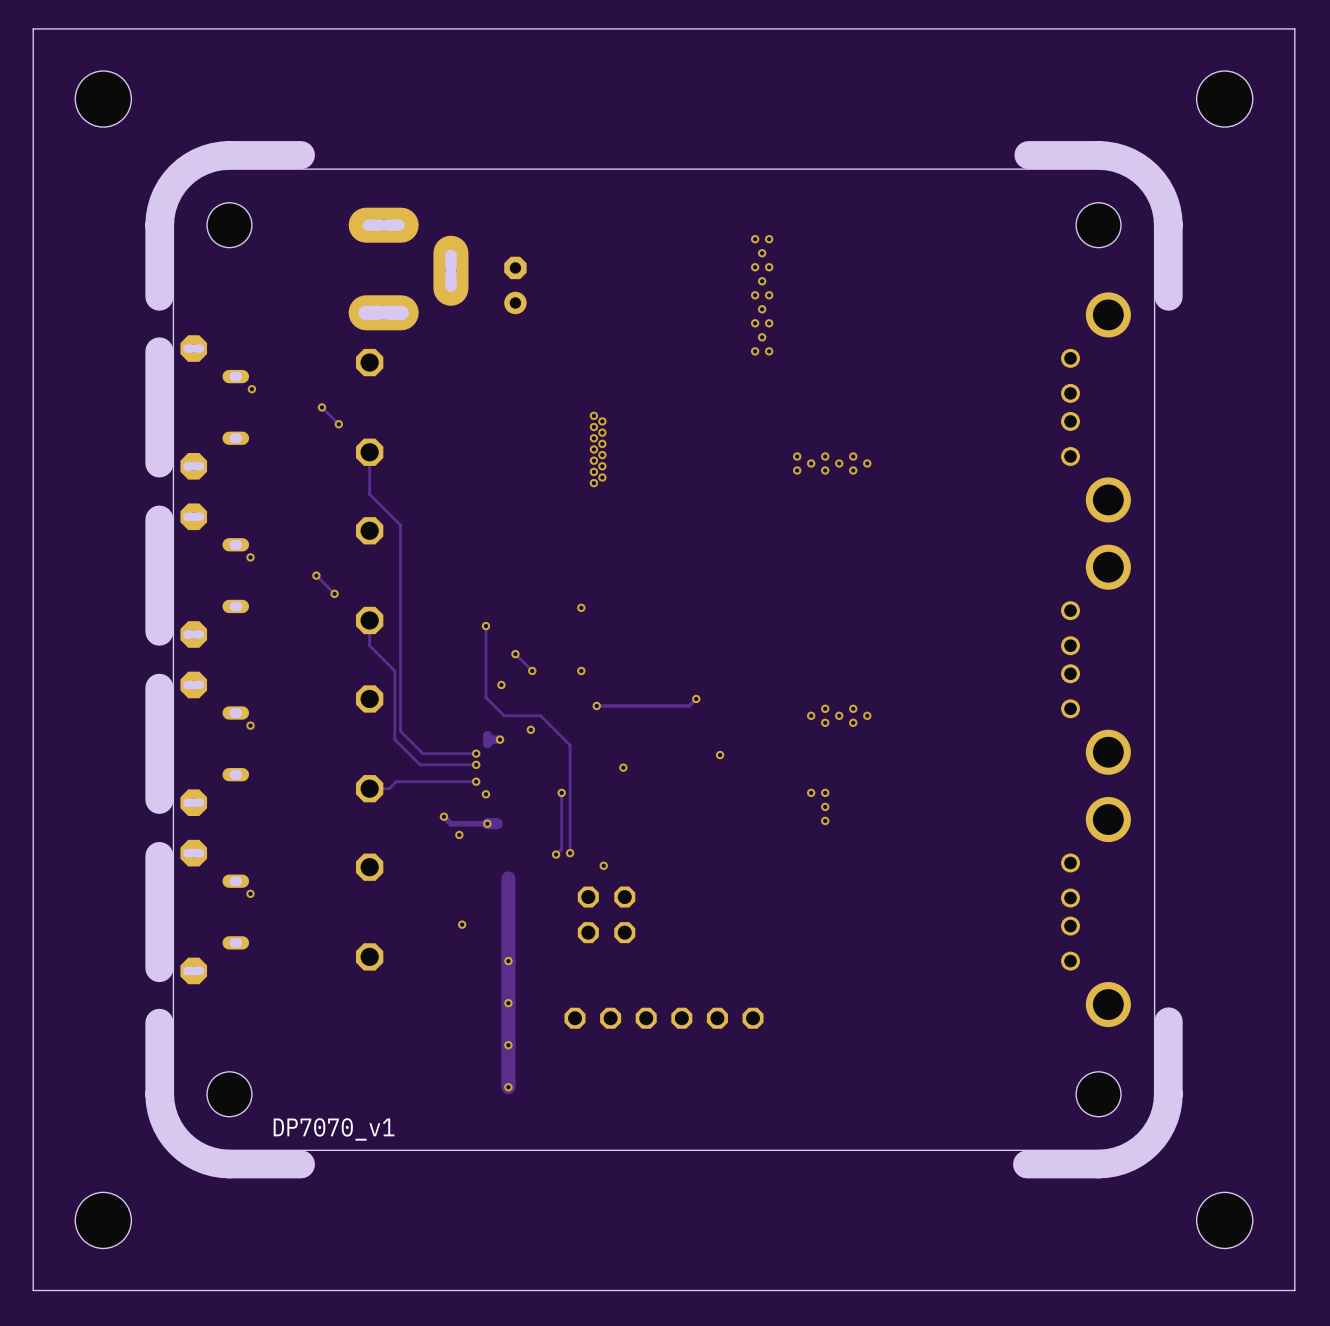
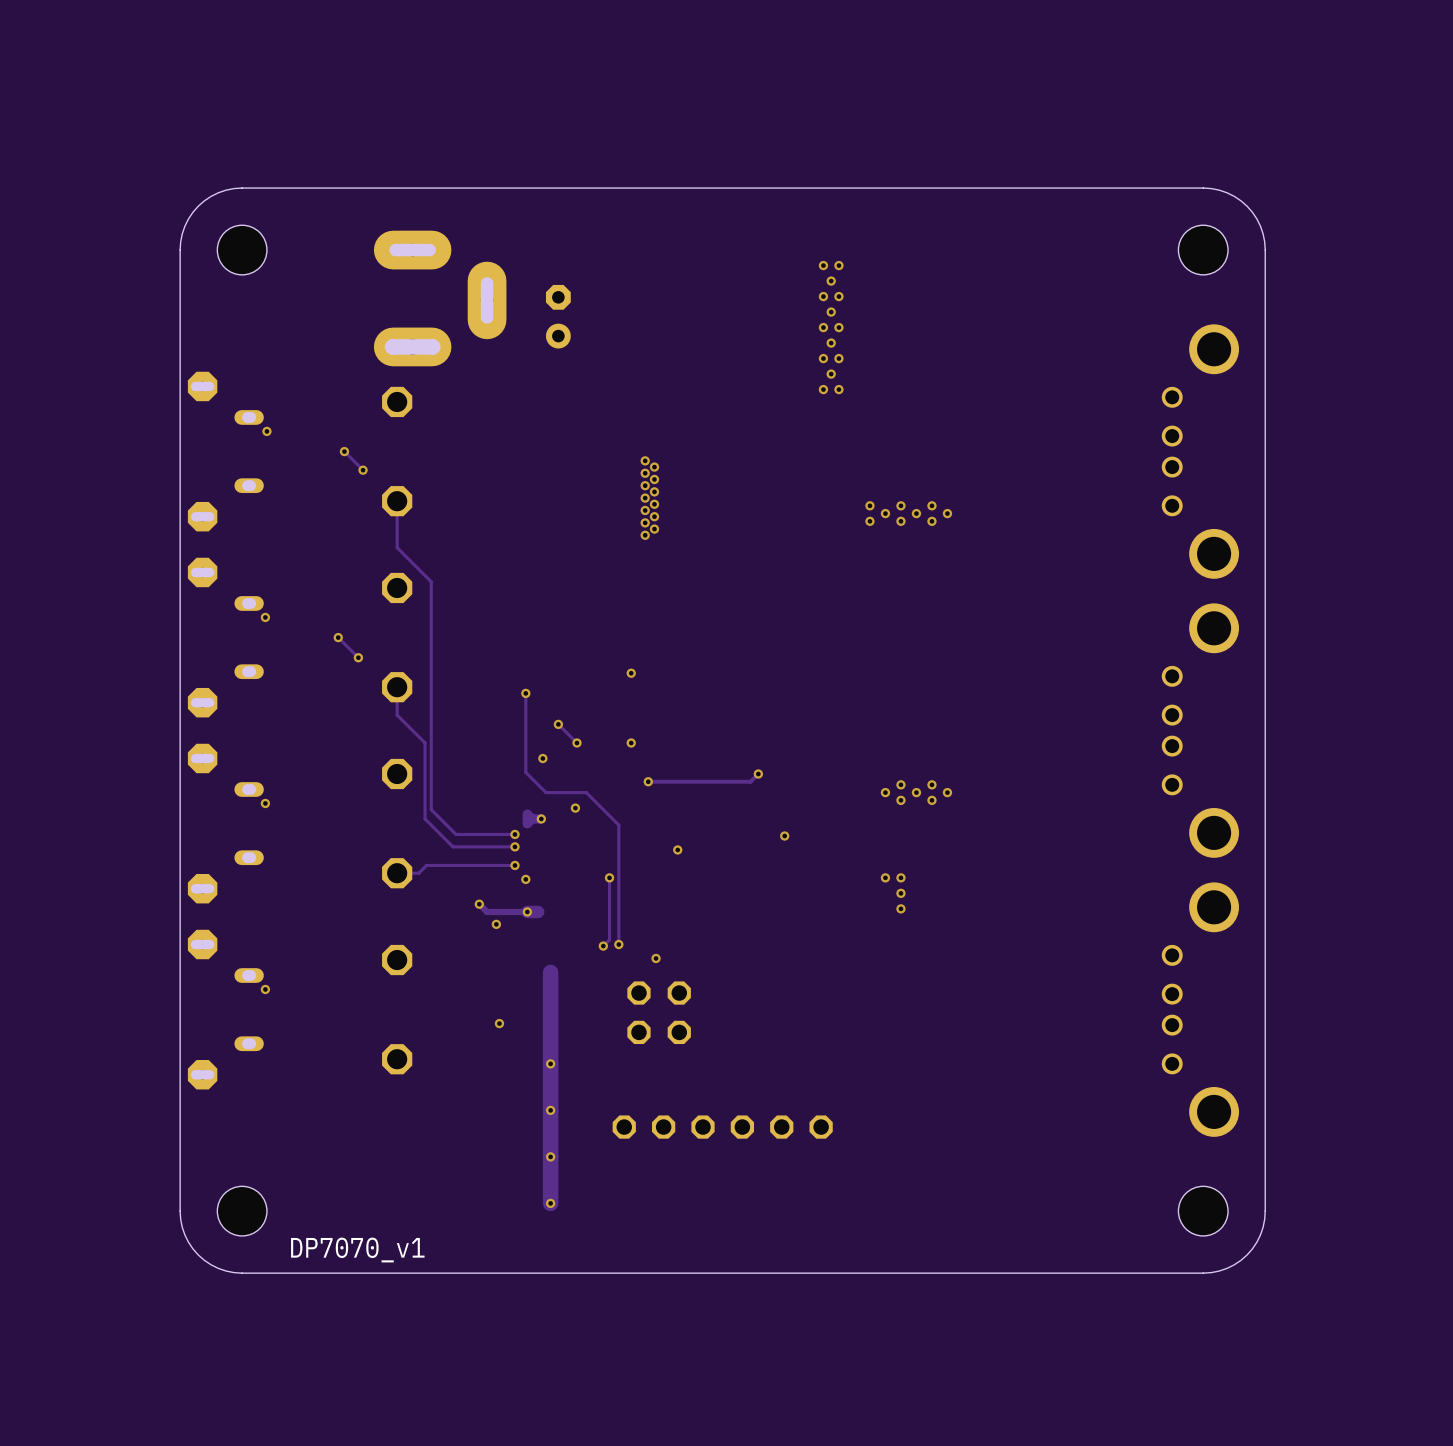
board edge: (1294, 28) (33, 28) (33, 1290) (1294, 1290) (1294, 28) -> none
hole: (103, 99) -> none
hole: (1224, 99) -> none
board edge: (300, 155) (221, 155) (199, 162) (179, 175) (166, 194) (159, 217) (159, 296) -> none
board edge: (1028, 155) (1114, 156) (1135, 165) (1148, 175) (1161, 194) (1168, 217) (1168, 296) -> none
board edge: (159, 351) (159, 463) -> none
board edge: (159, 519) (159, 631) -> none
board edge: (159, 687) (159, 799) -> none
board edge: (159, 855) (159, 968) -> none
board edge: (1168, 1021) (1168, 1102) (1161, 1124) (1148, 1143) (1128, 1157) (1106, 1163) (1027, 1164) -> none
board edge: (159, 1022) (159, 1102) (166, 1124) (179, 1143) (199, 1157) (221, 1163) (300, 1164) -> none
hole: (103, 1220) -> none
hole: (1224, 1220) -> none

